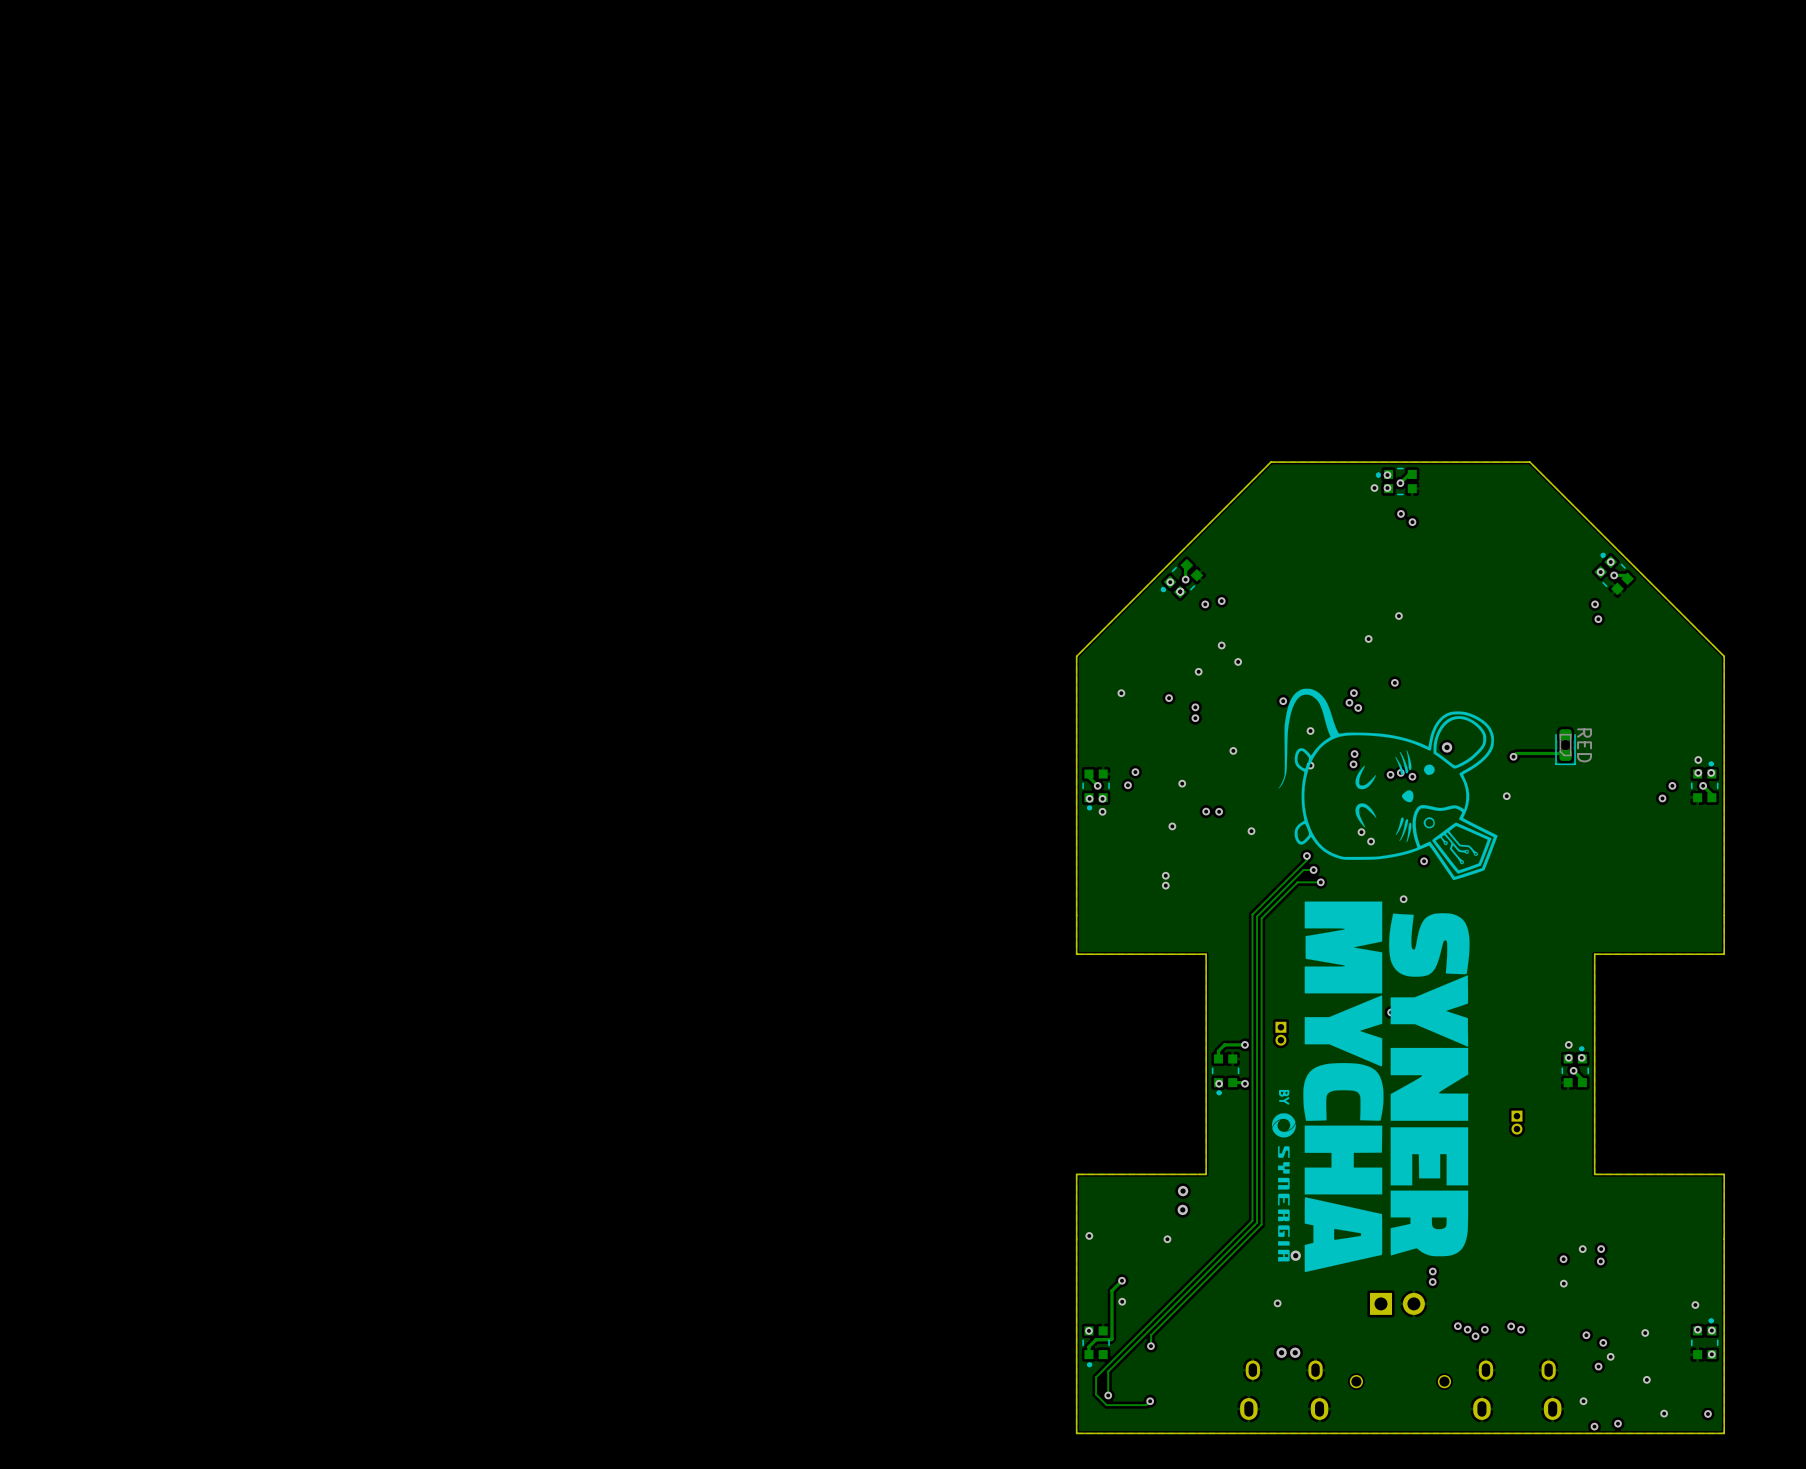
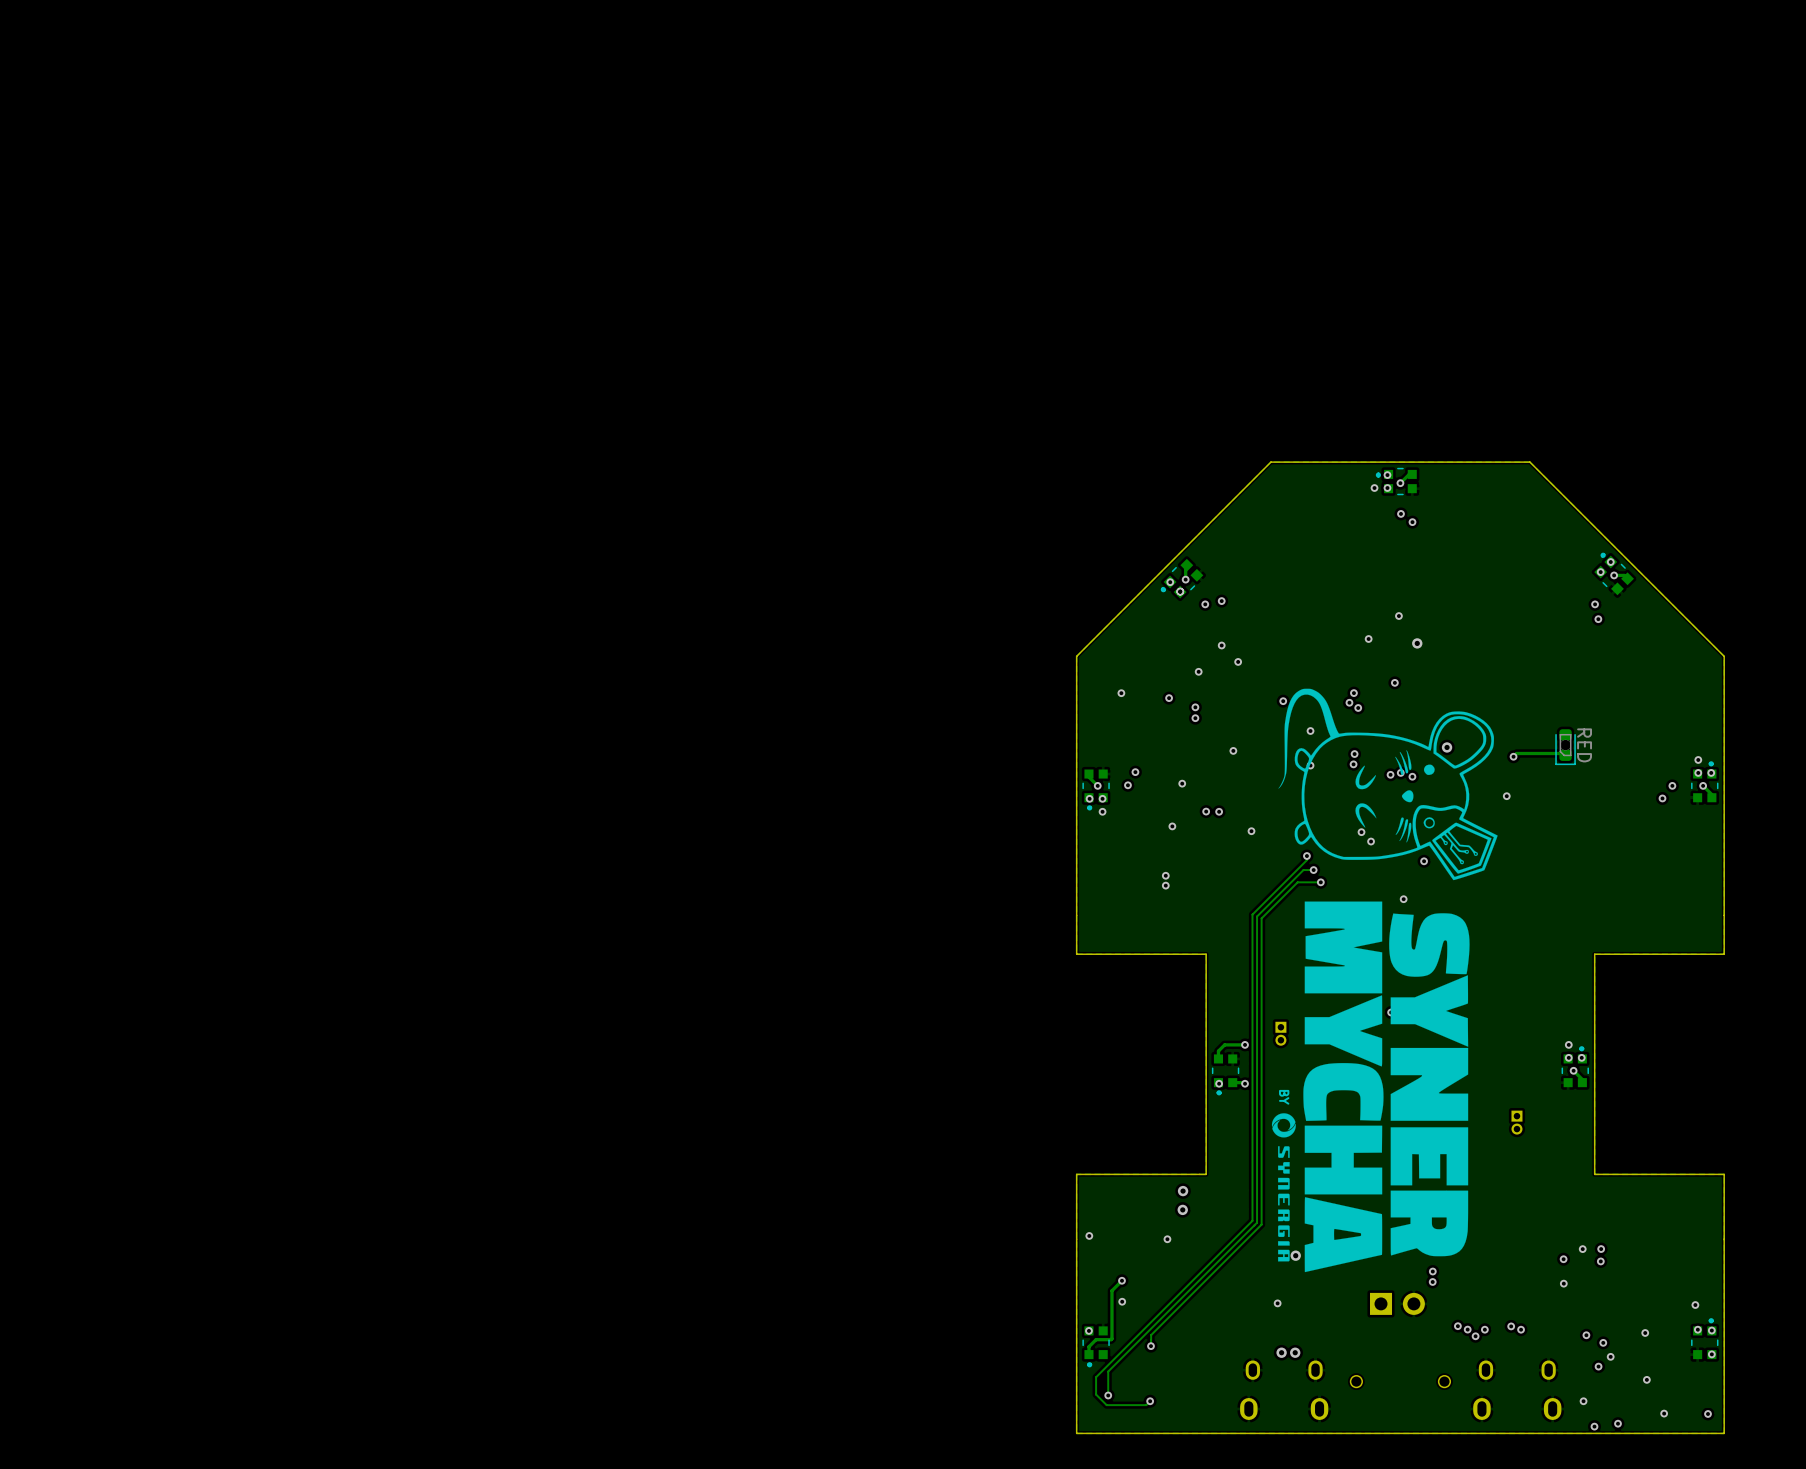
via: none -> (1417, 643)

